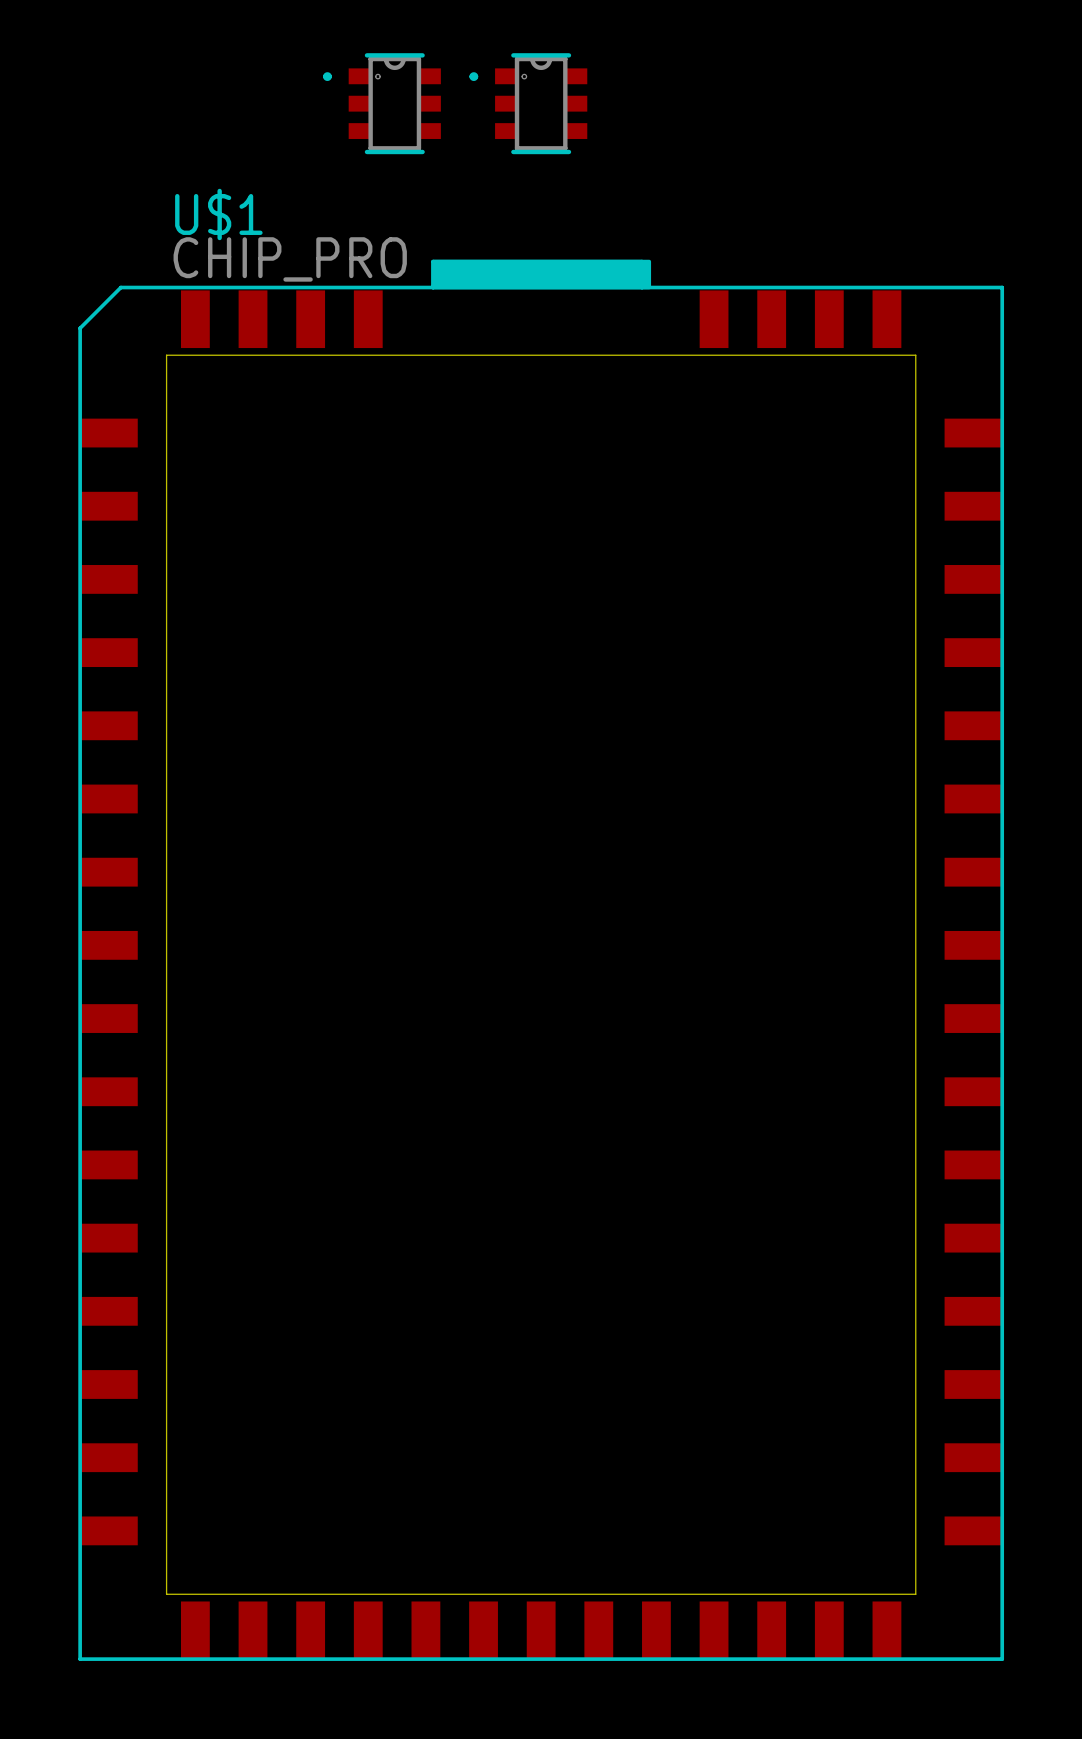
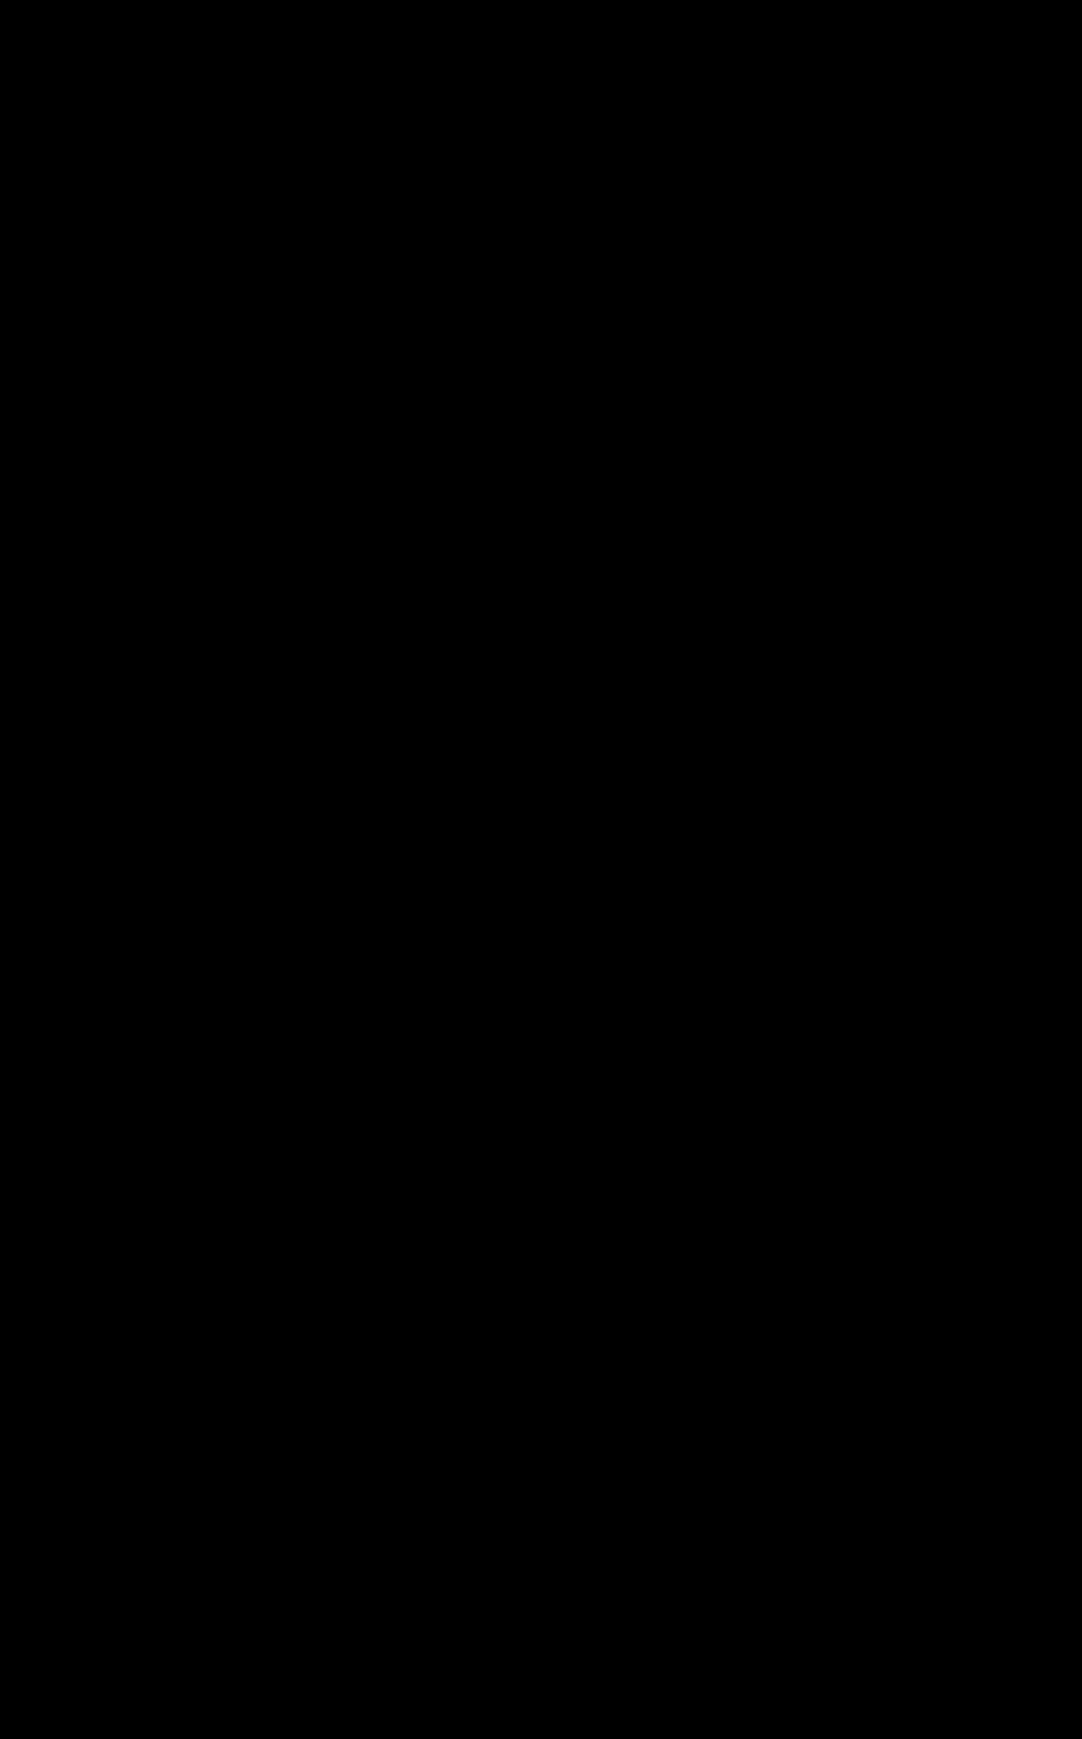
part: (381, 103) -> none
part: (528, 103) -> none
U$1: CHIP_PRO (541, 960) -> none

